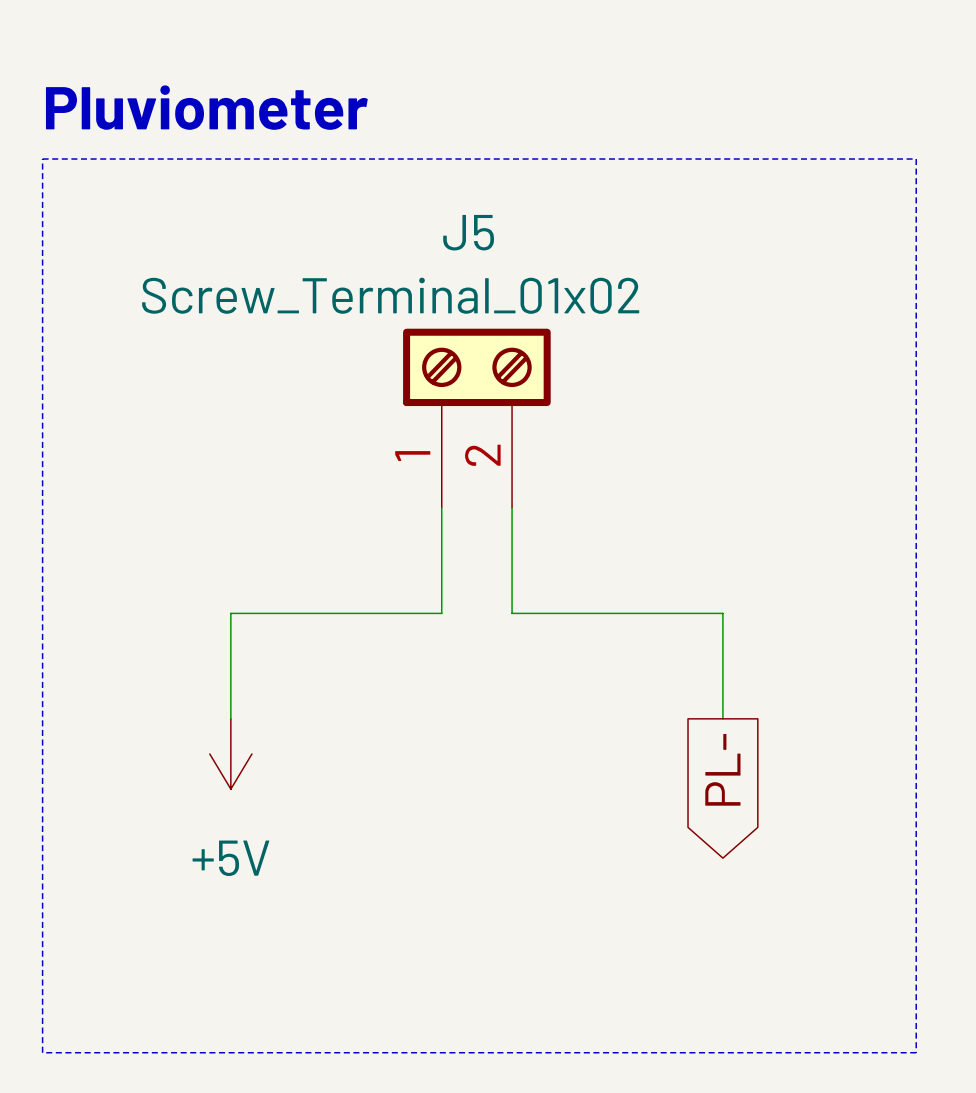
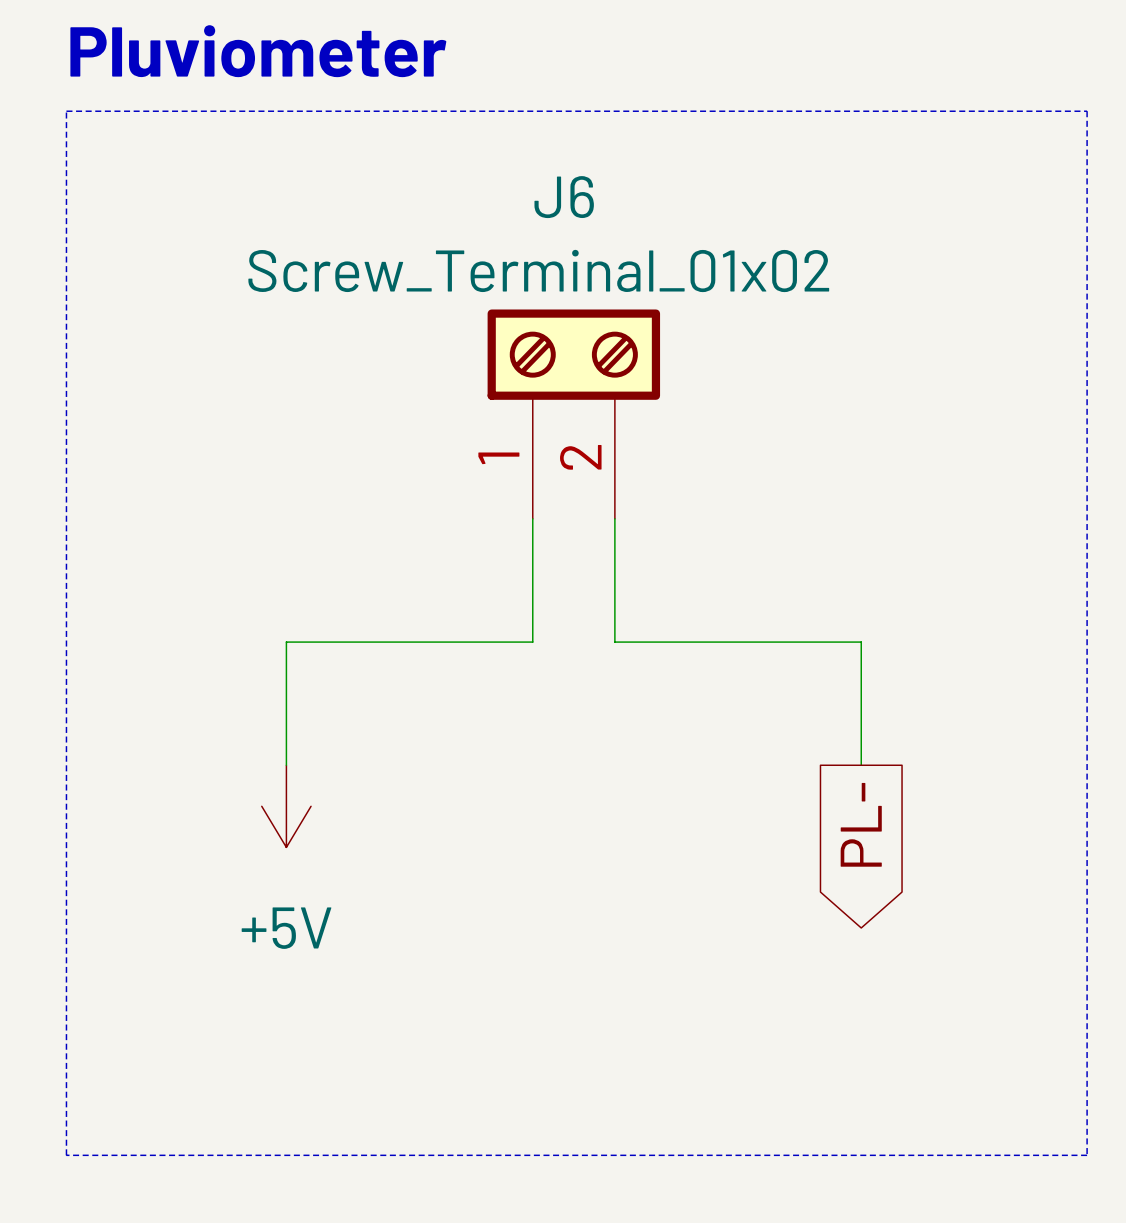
J5 name: J5 (468, 232) -> J6 (564, 197)
J5 value position: Screw_Terminal_01x02 (390, 295) -> Screw_Terminal_01x02 (538, 270)

